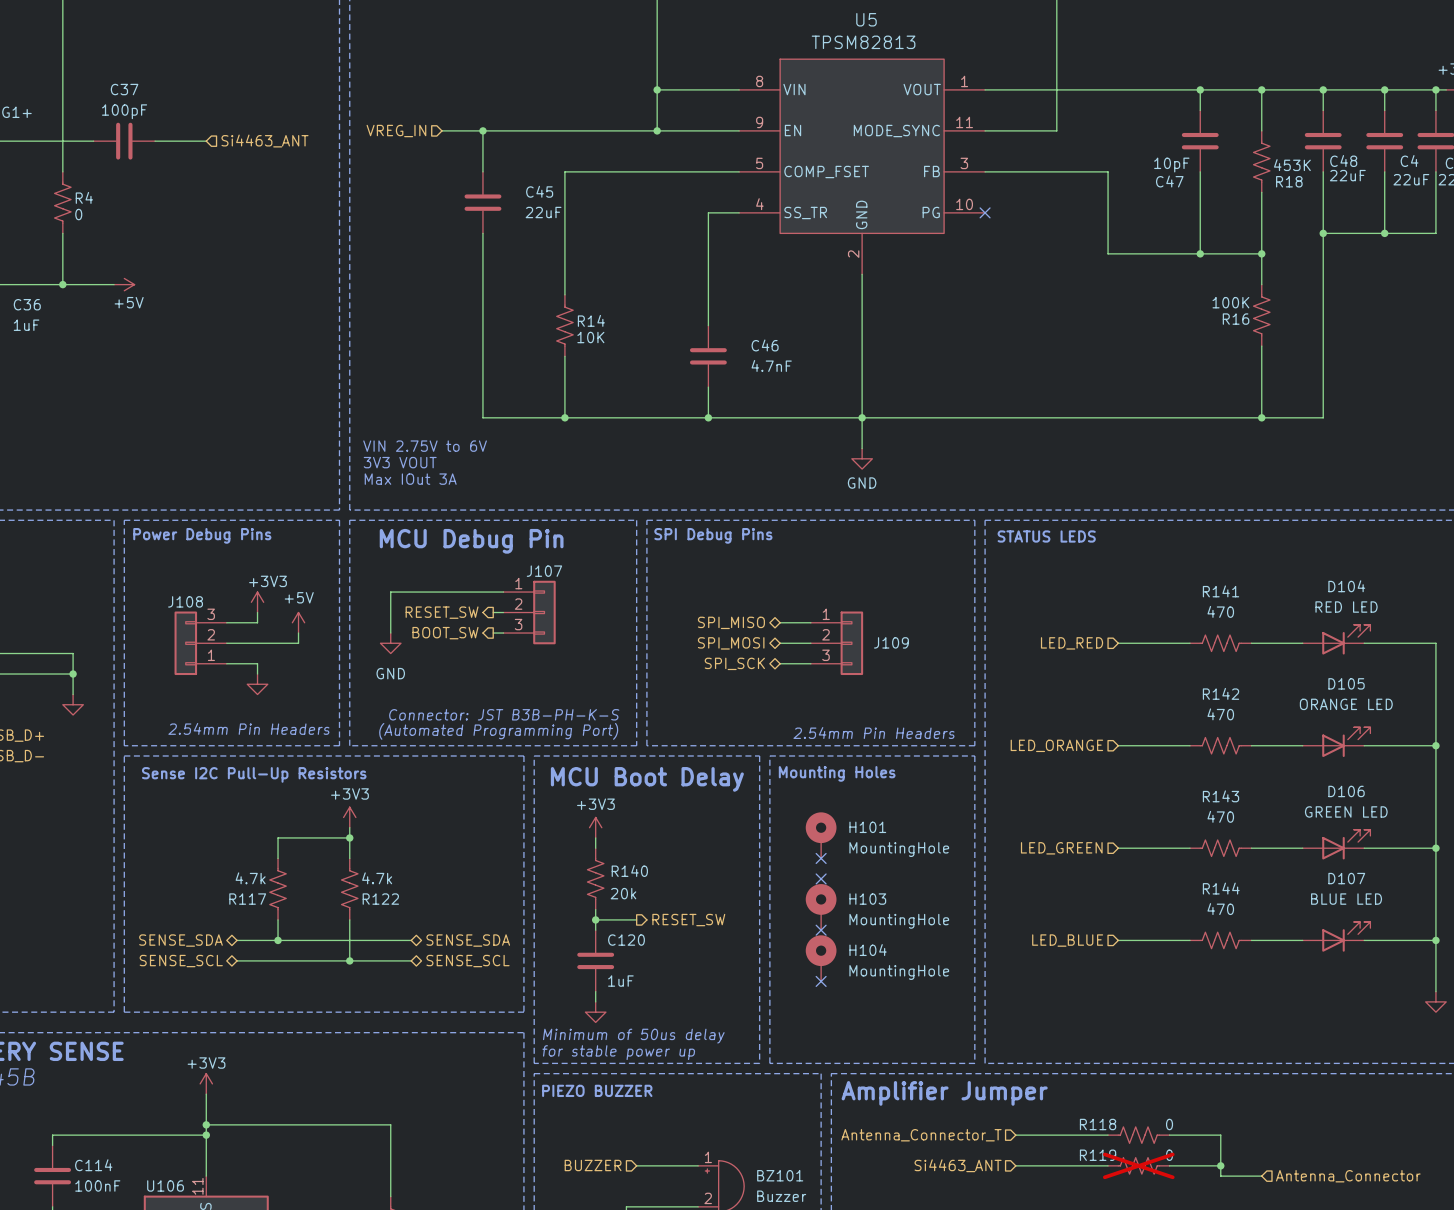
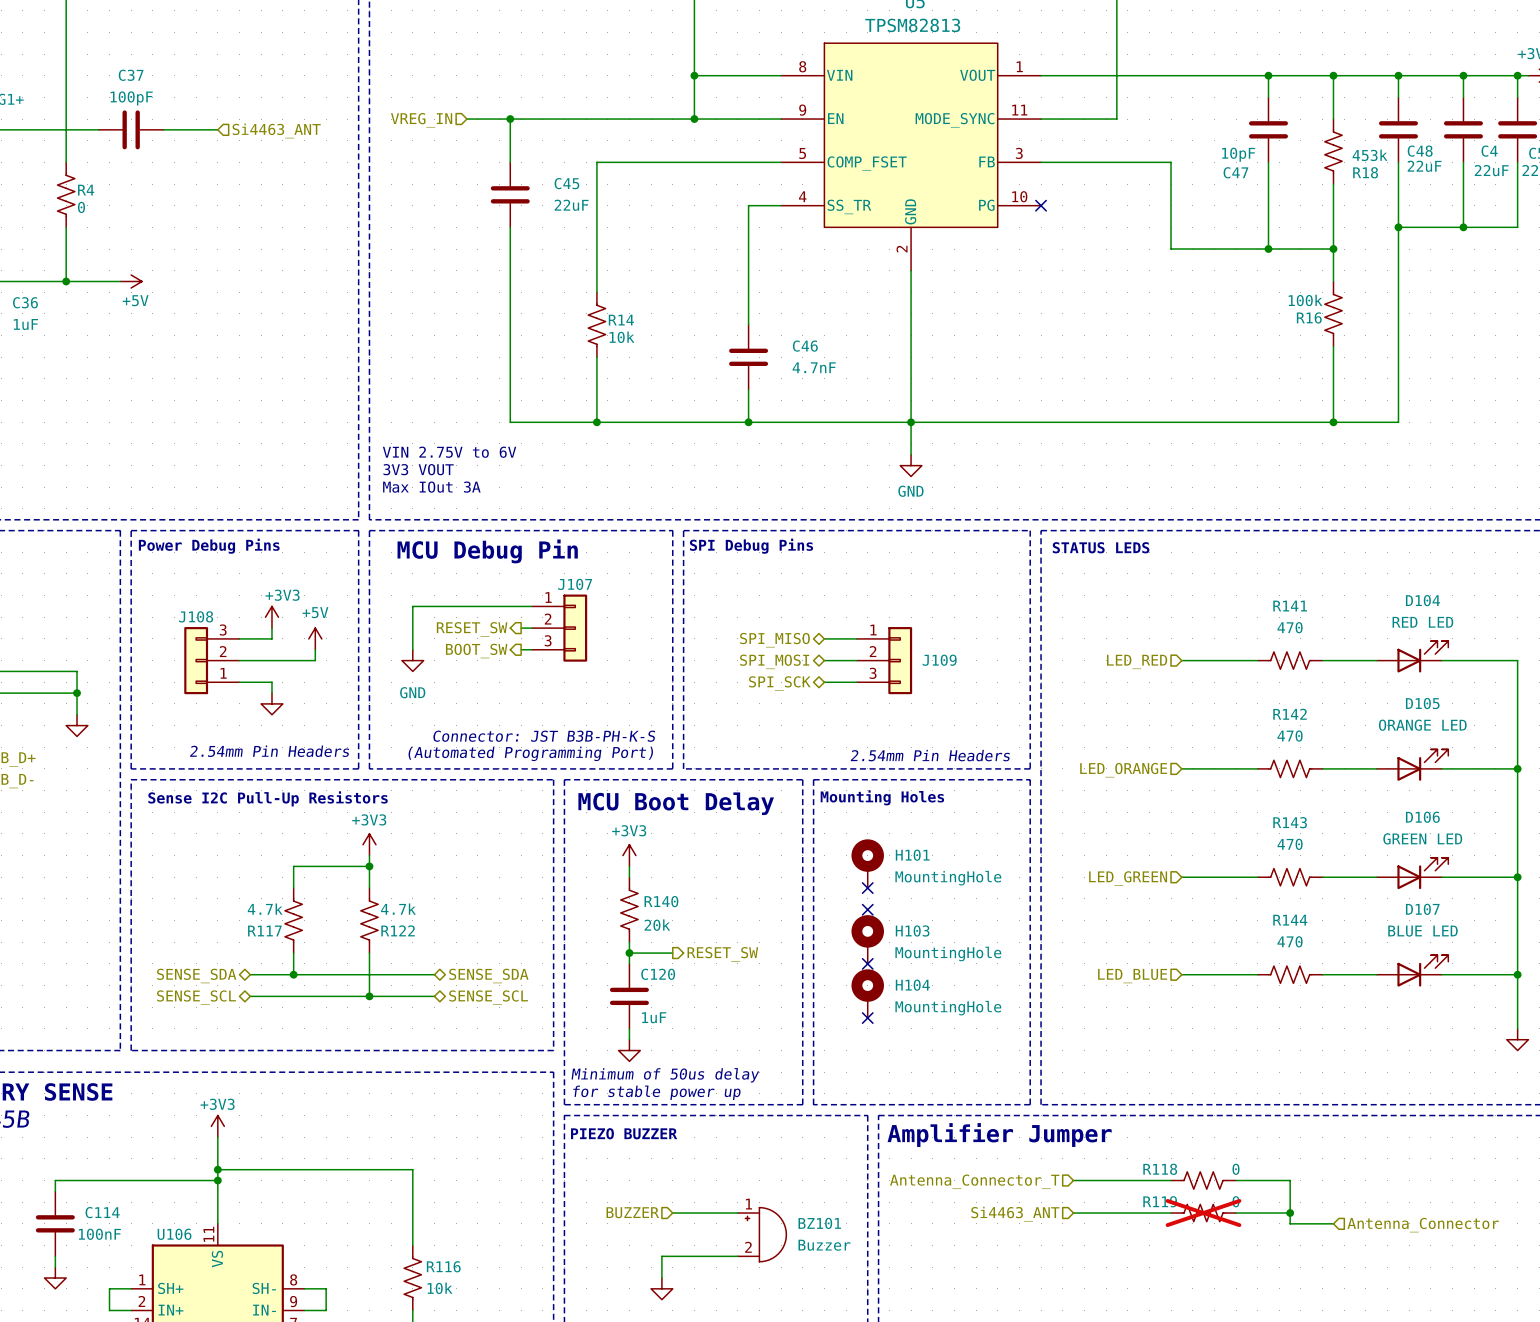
R18 value: 453K (1292, 165) -> 453k (1370, 155)
R16 value: 100K (1230, 302) -> 100k (1305, 300)
R14 value: 10K (590, 337) -> 10k (621, 337)

